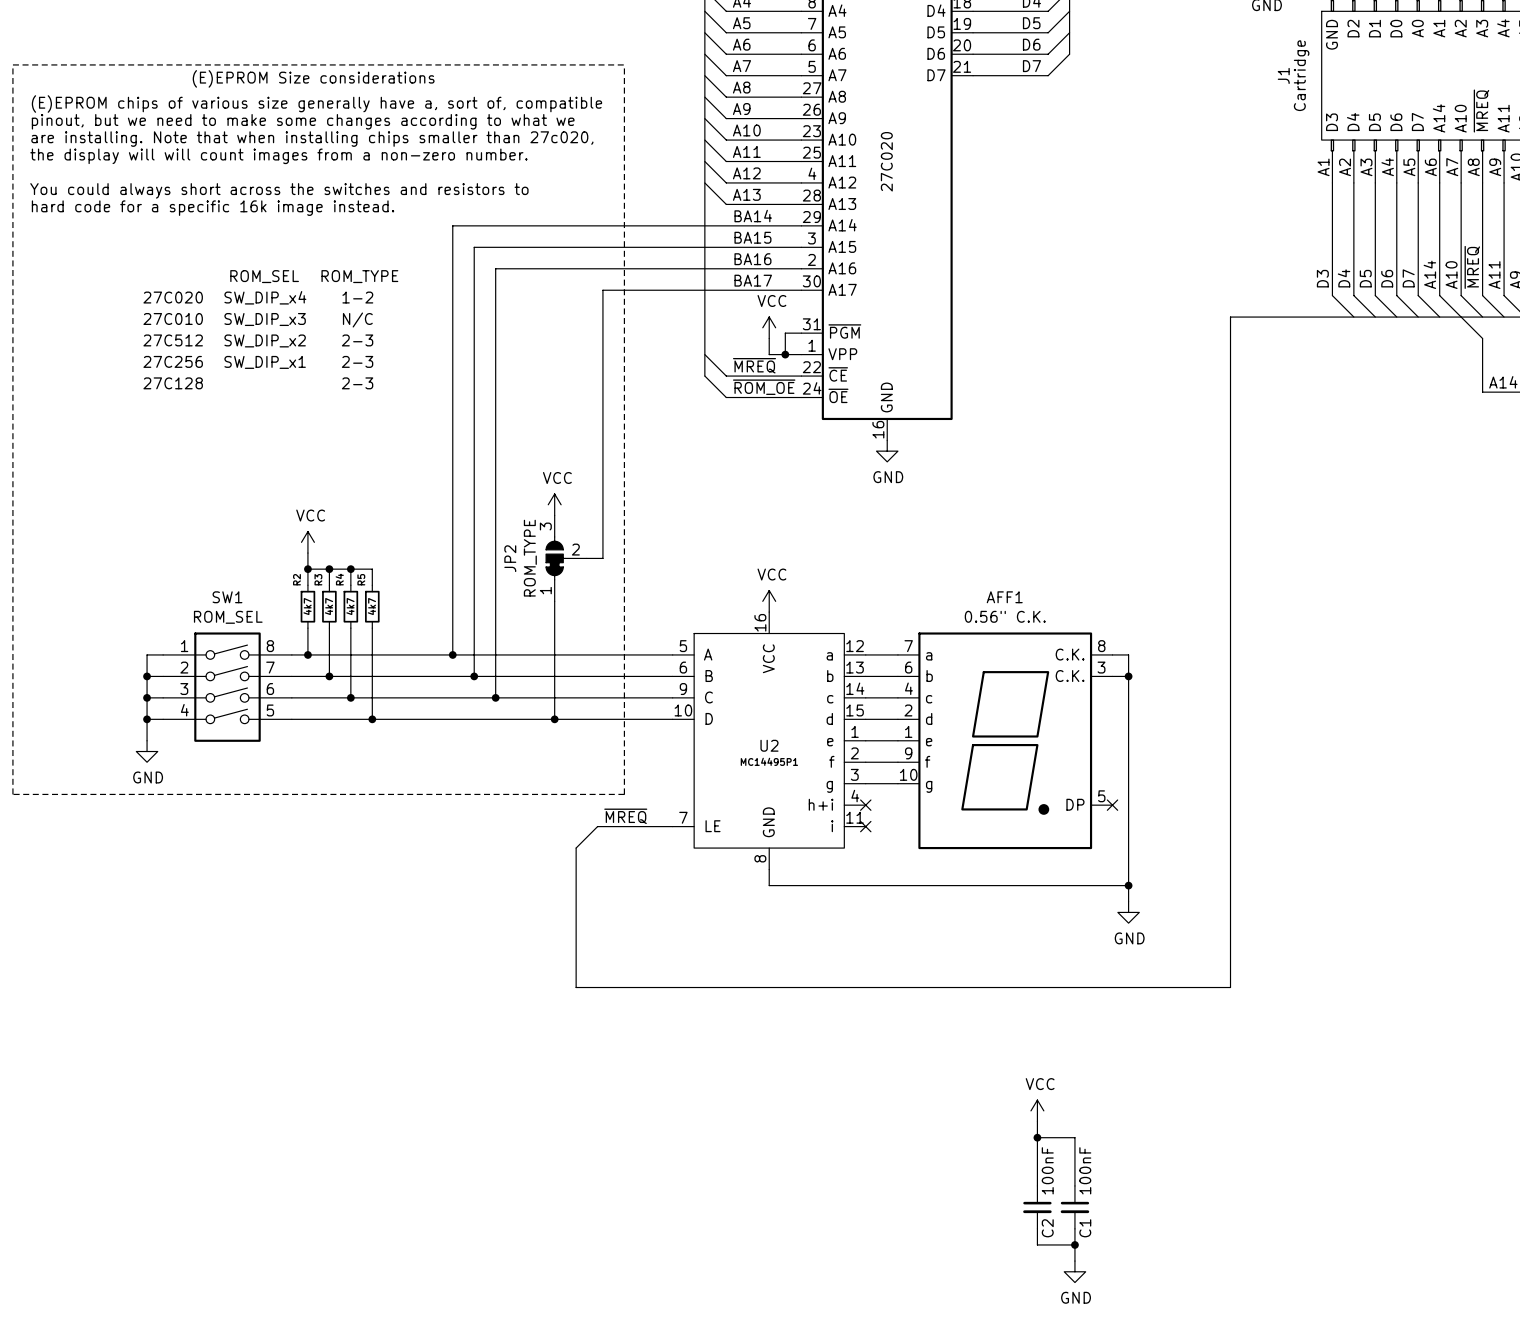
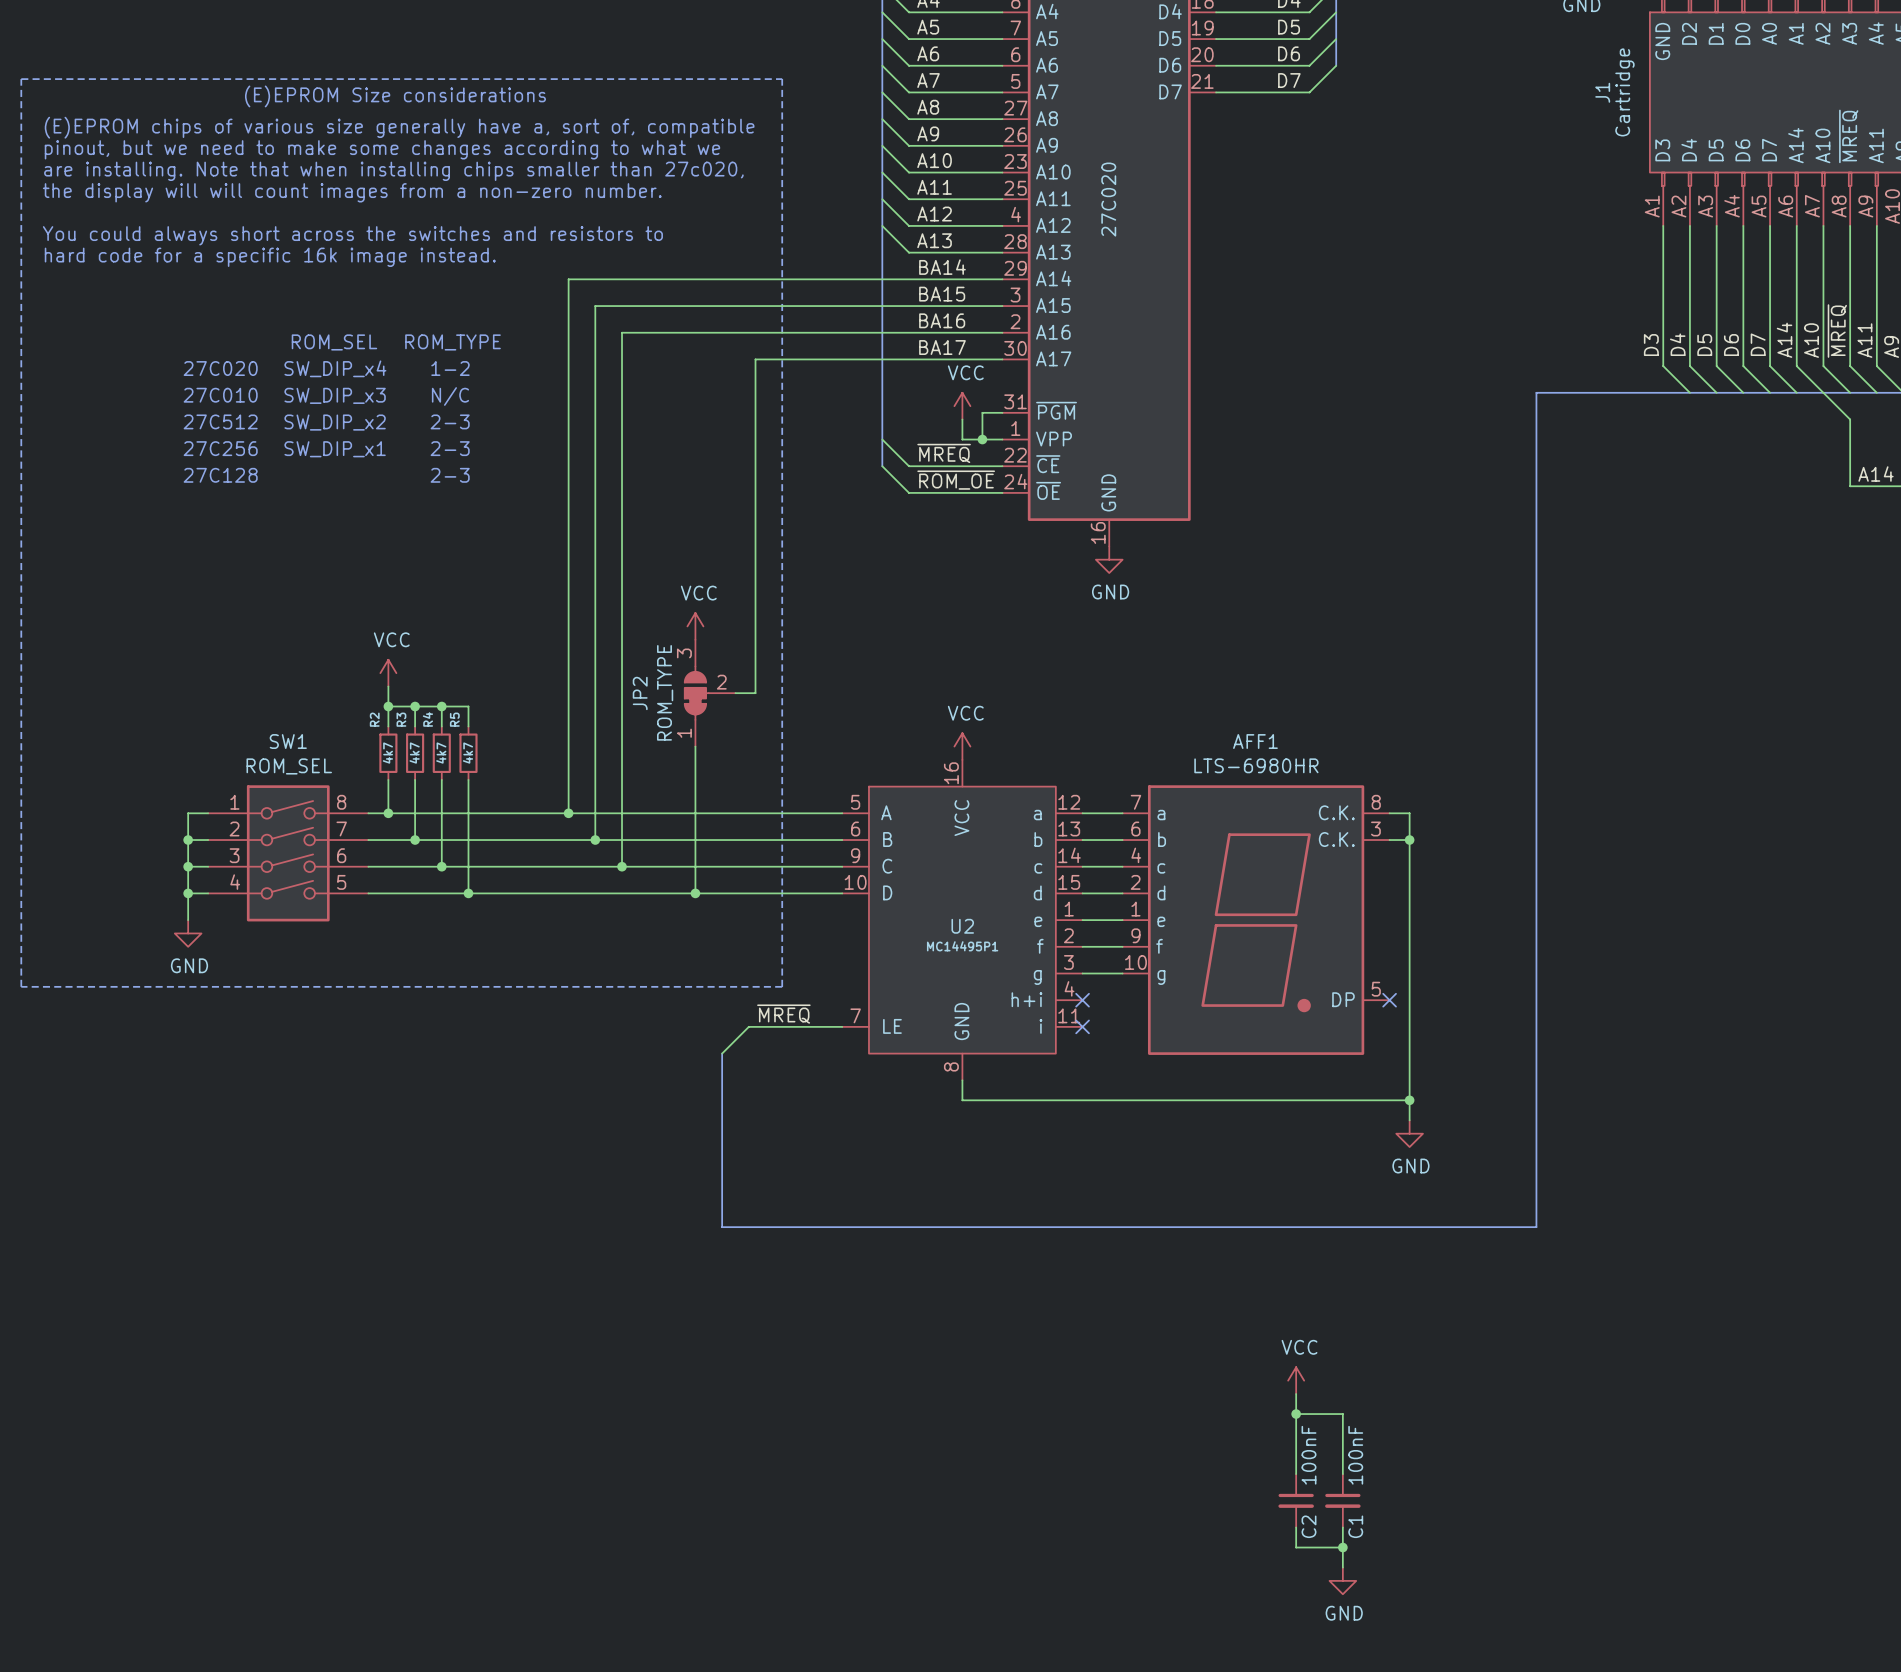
AFF1 value: 0.56" C.K. (1005, 616) -> LTS-6980HR (1256, 765)

